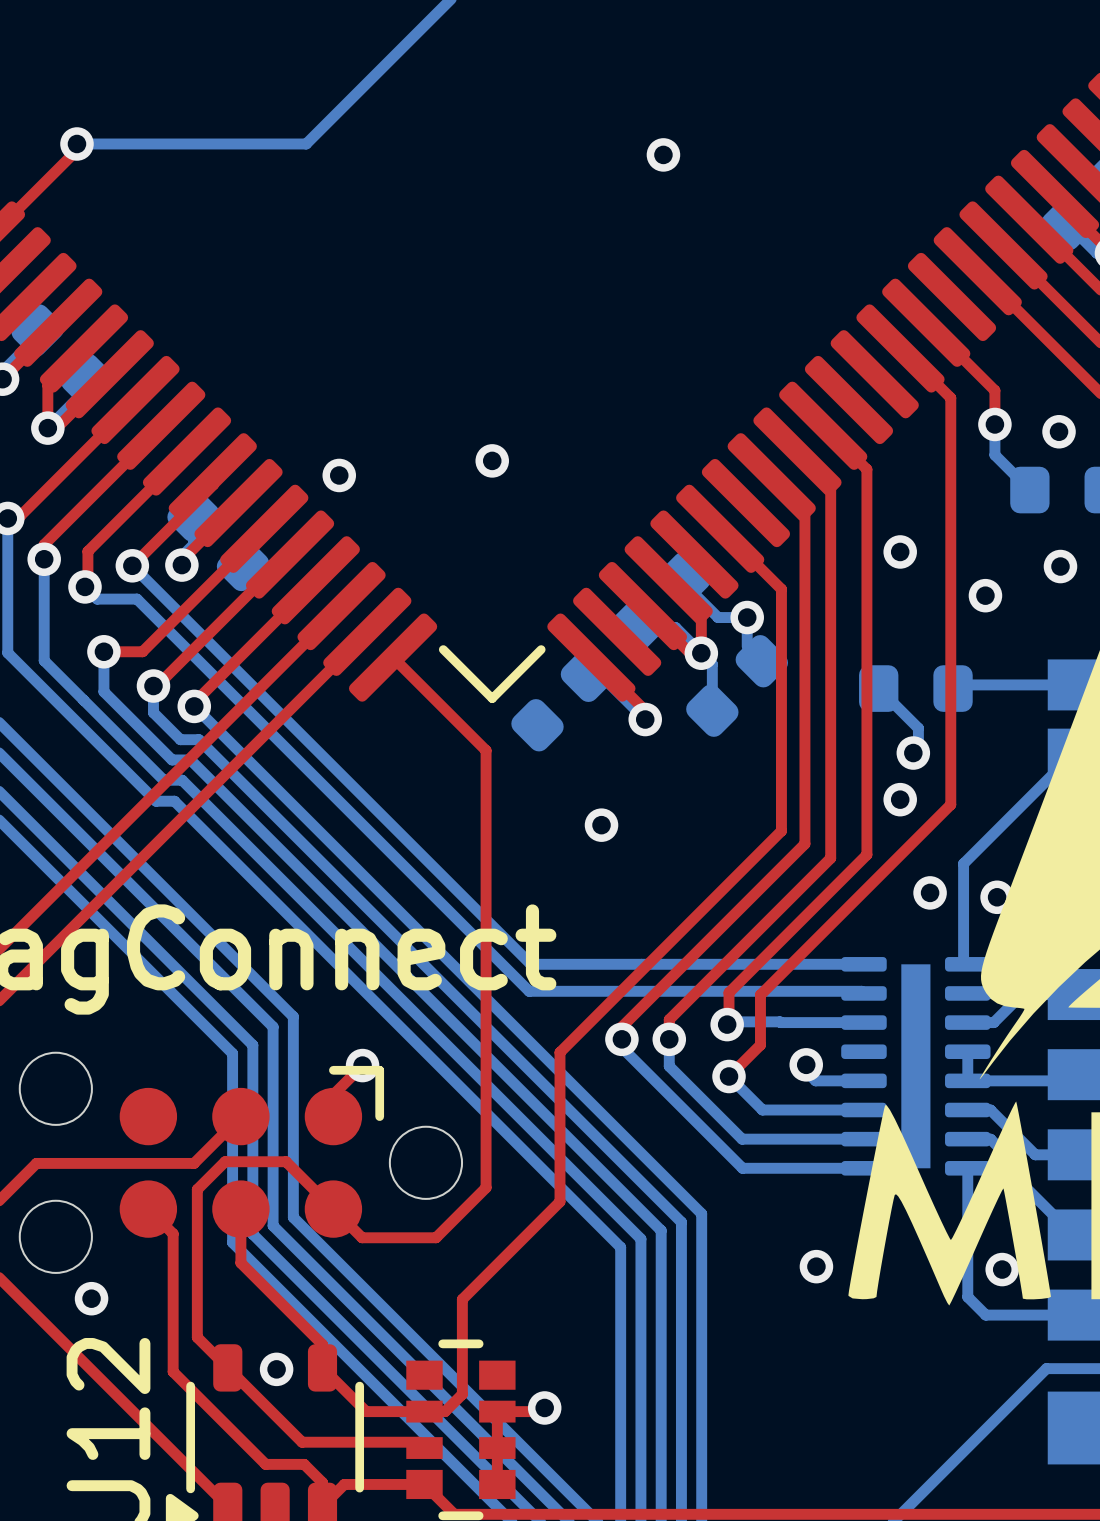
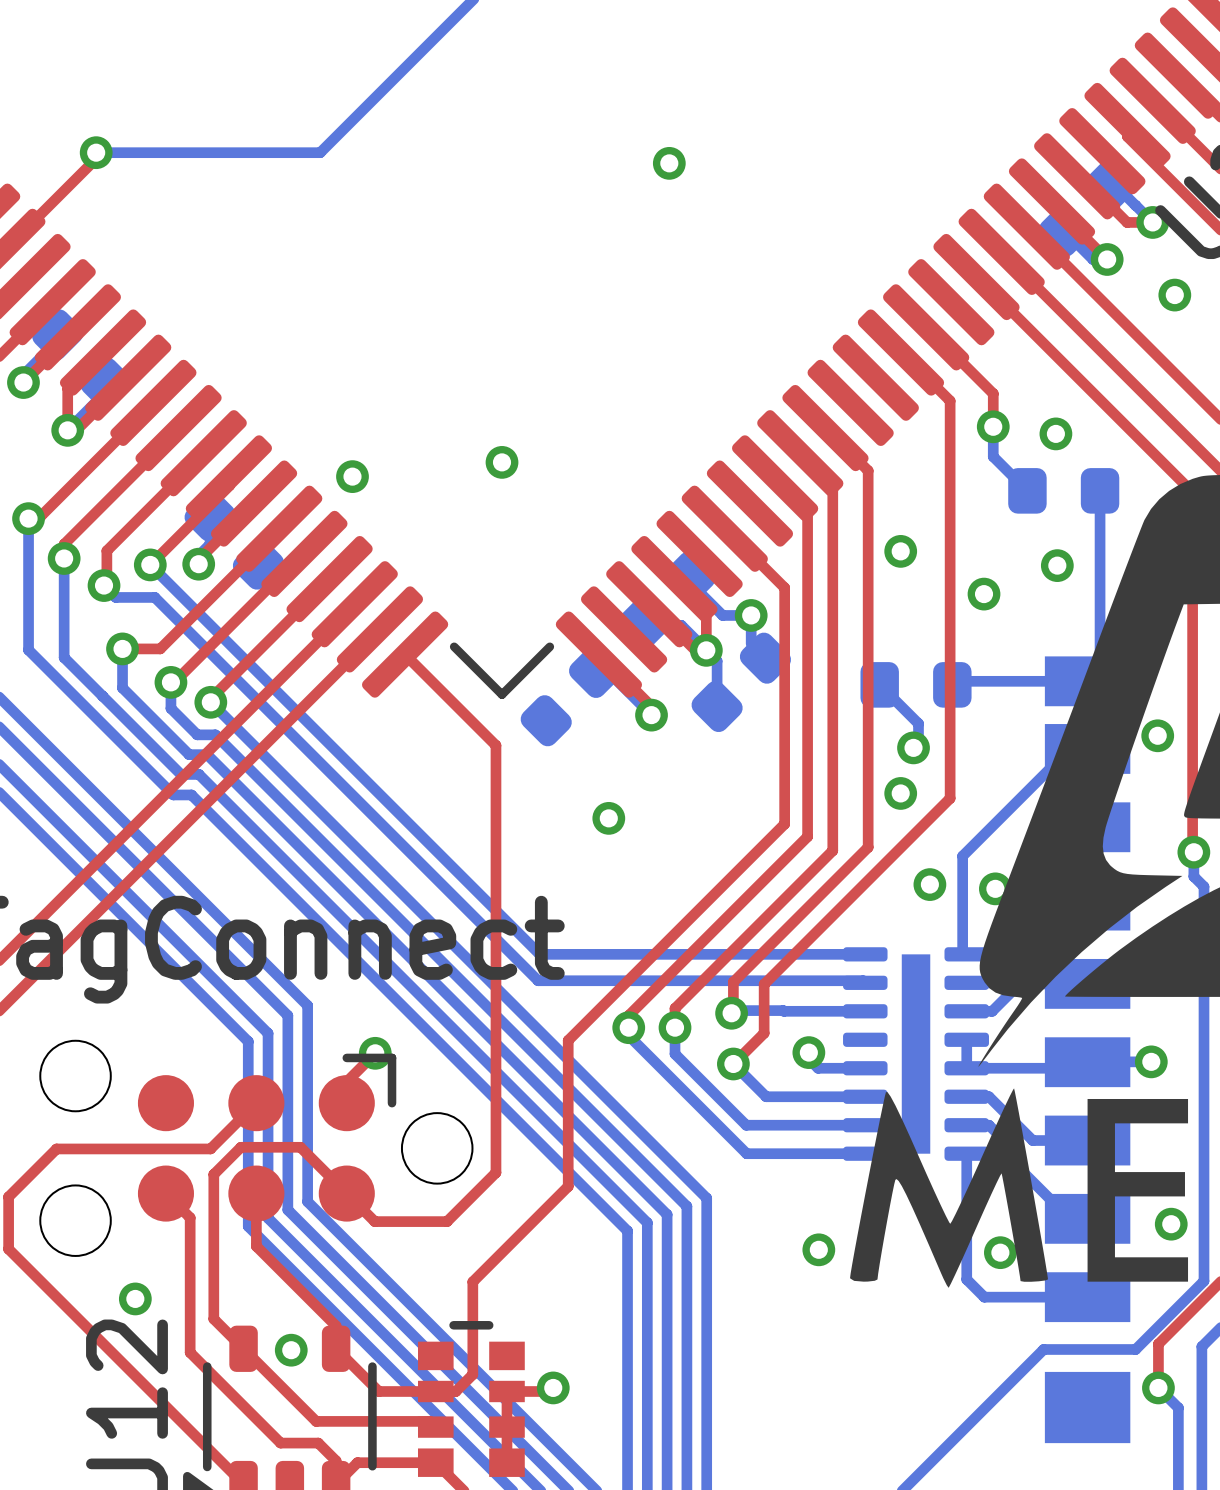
via position: (91, 1298) -> (135, 1298)

